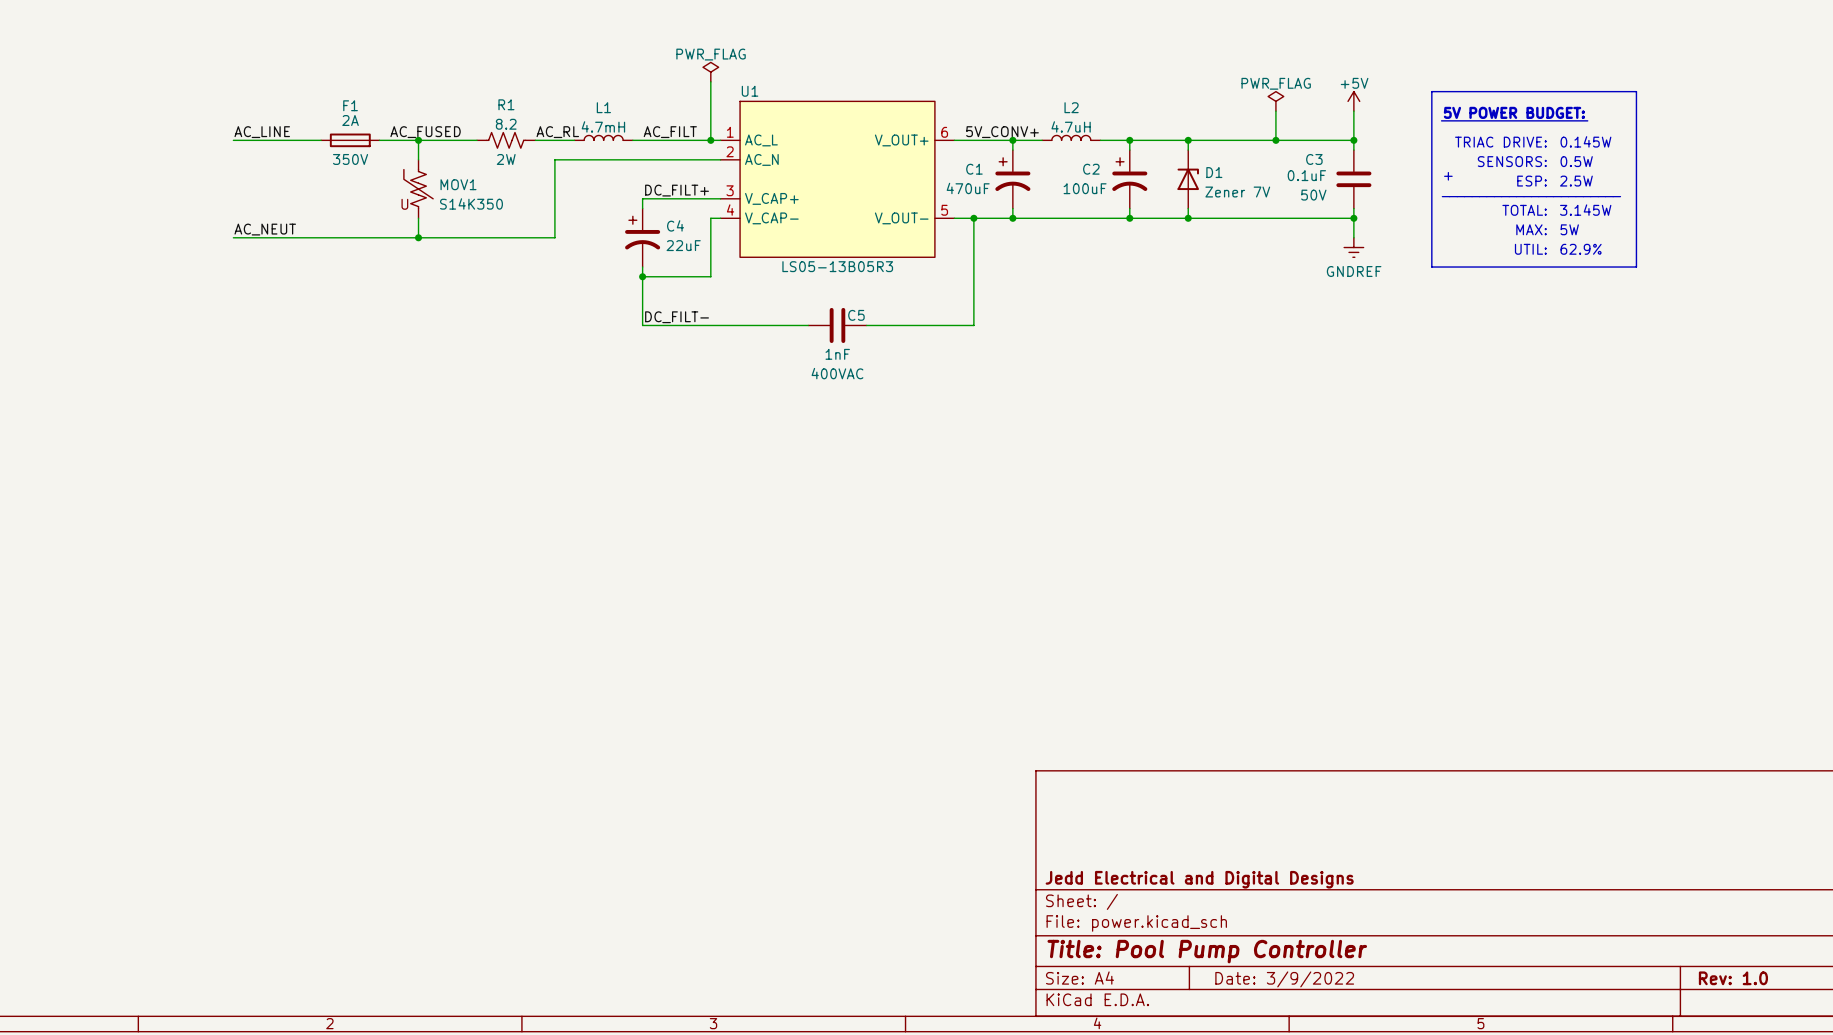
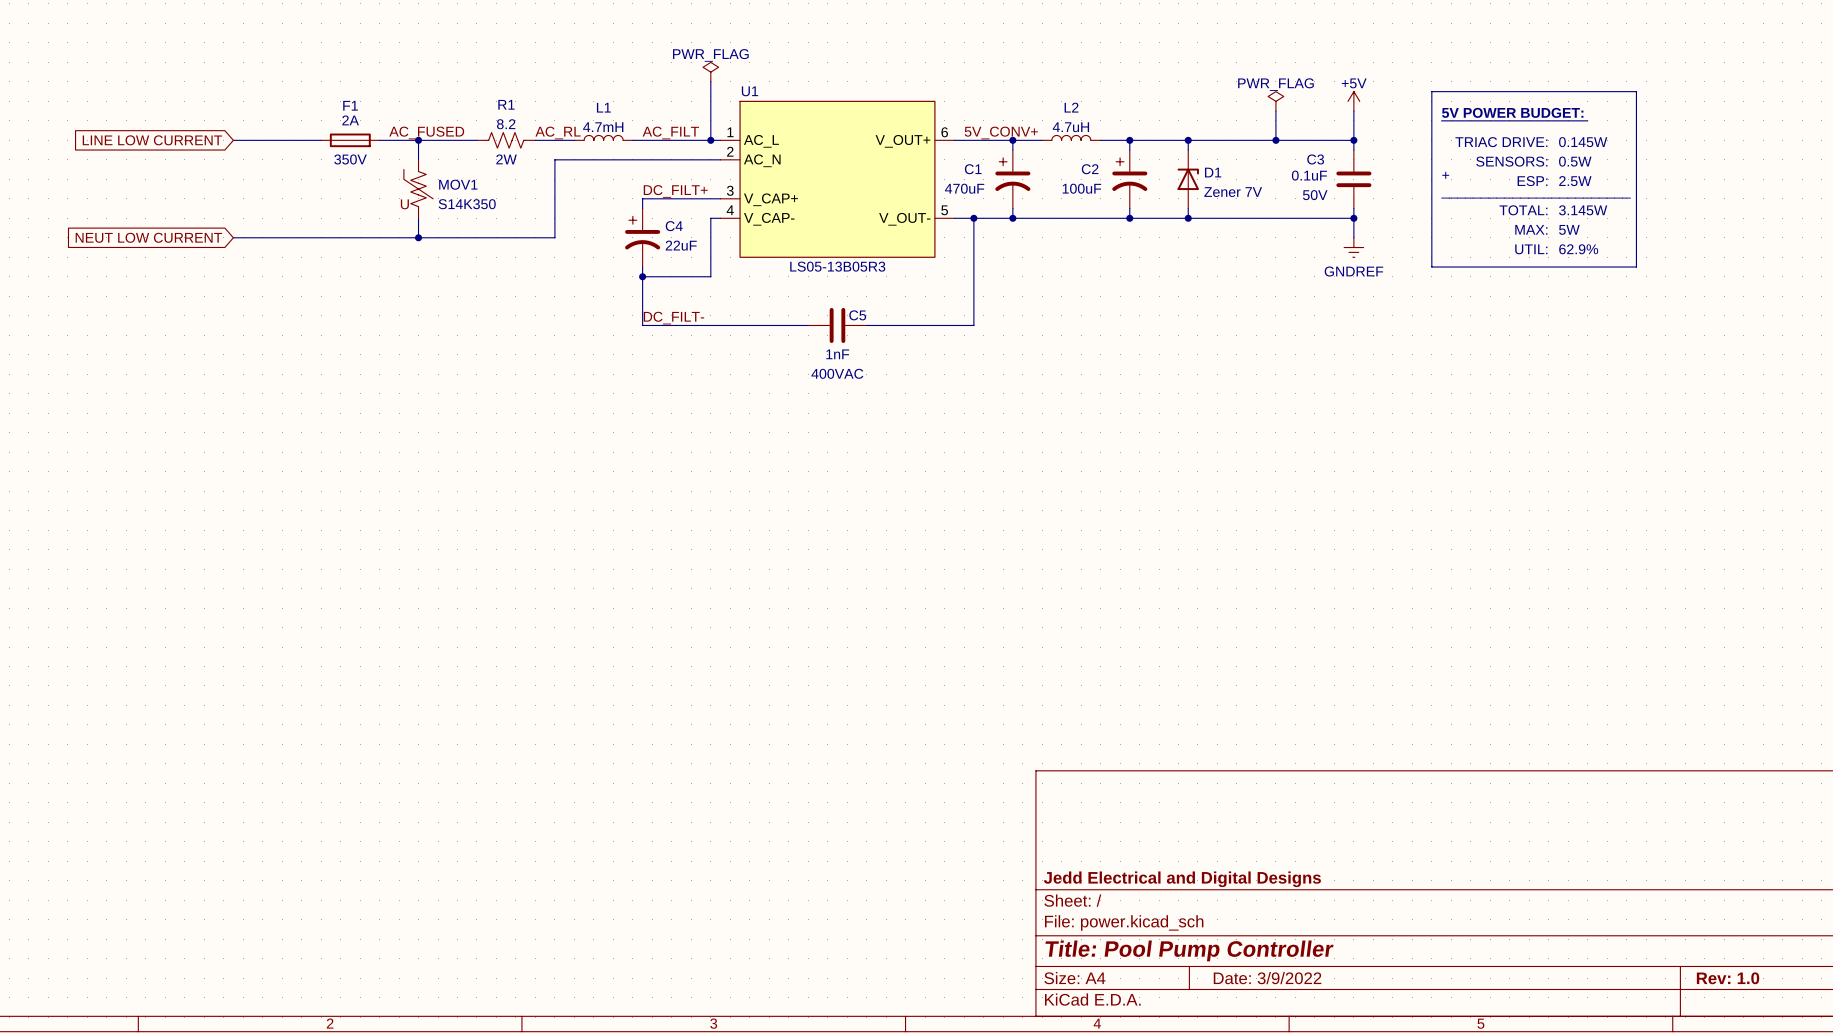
label: AC_LINE (262, 132) -> none
global label: none -> LINE LOW CURRENT (152, 140)
label: AC_NEUT (265, 229) -> none
global label: none -> NEUT LOW CURRENT (148, 237)

